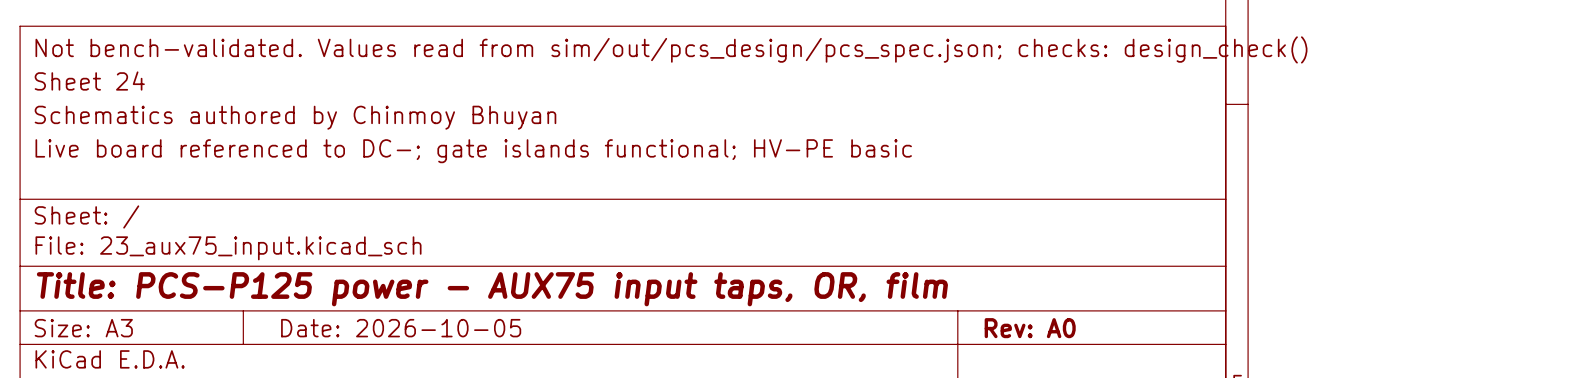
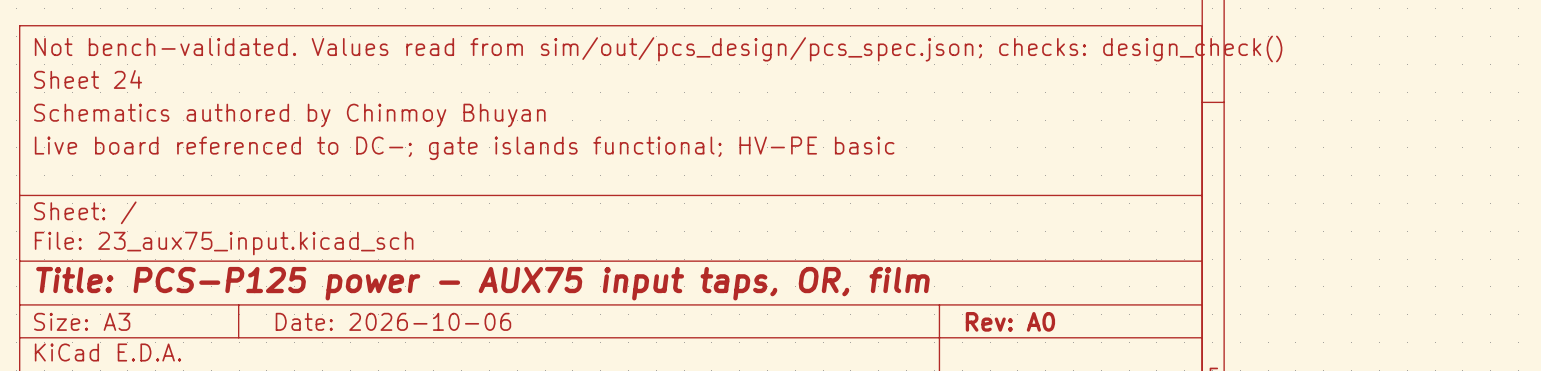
title block: Date: 2026-10-05 (401, 328) -> Date: 2026-10-06 (393, 321)

